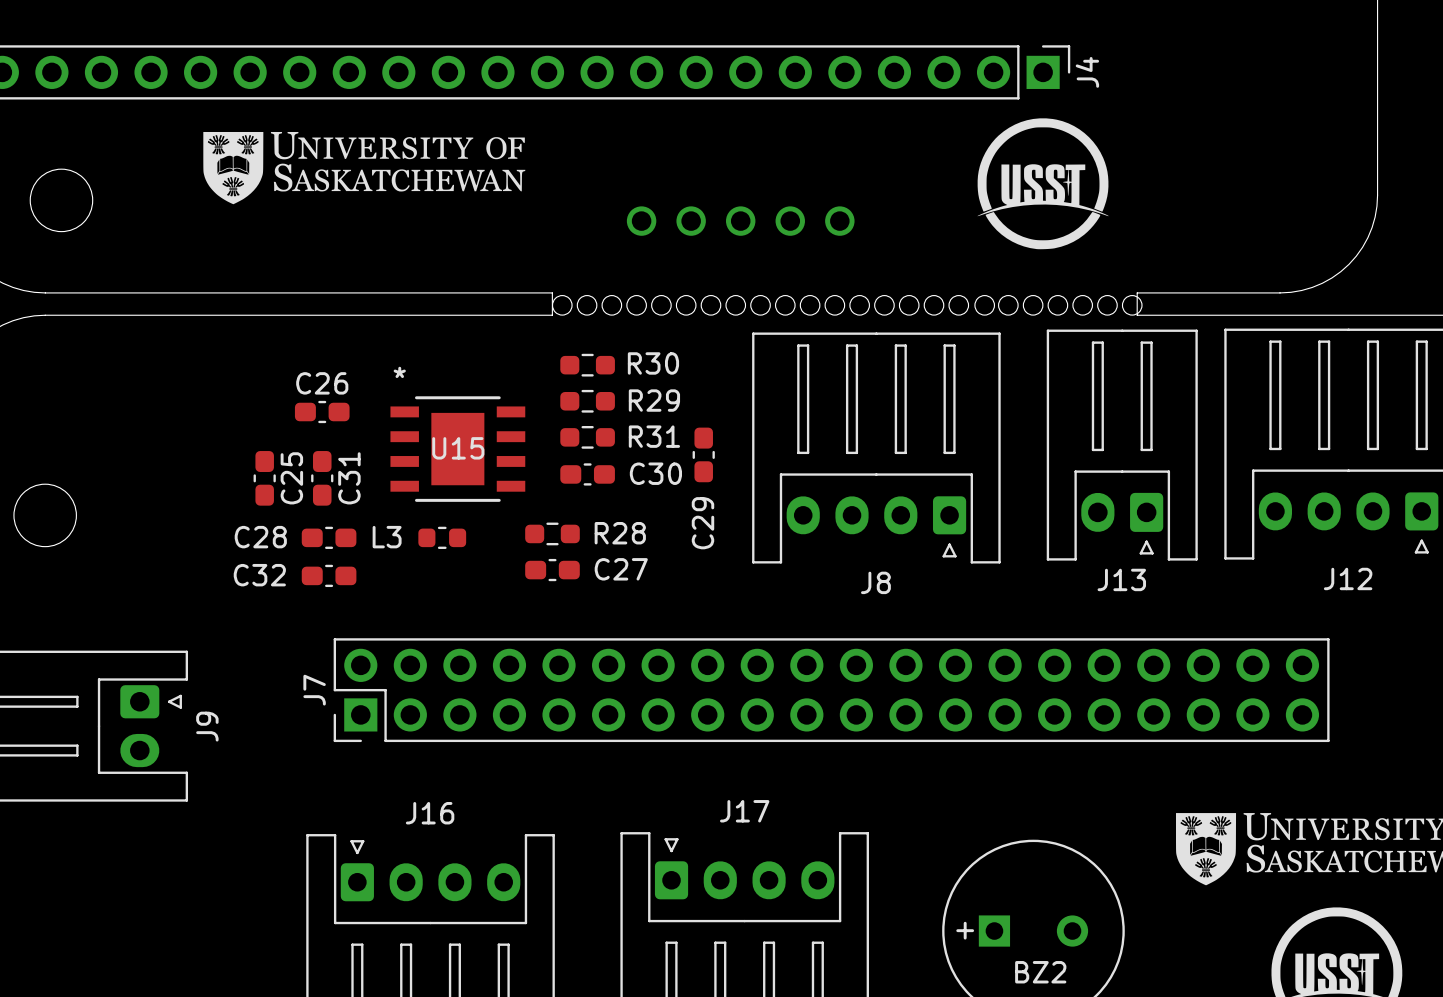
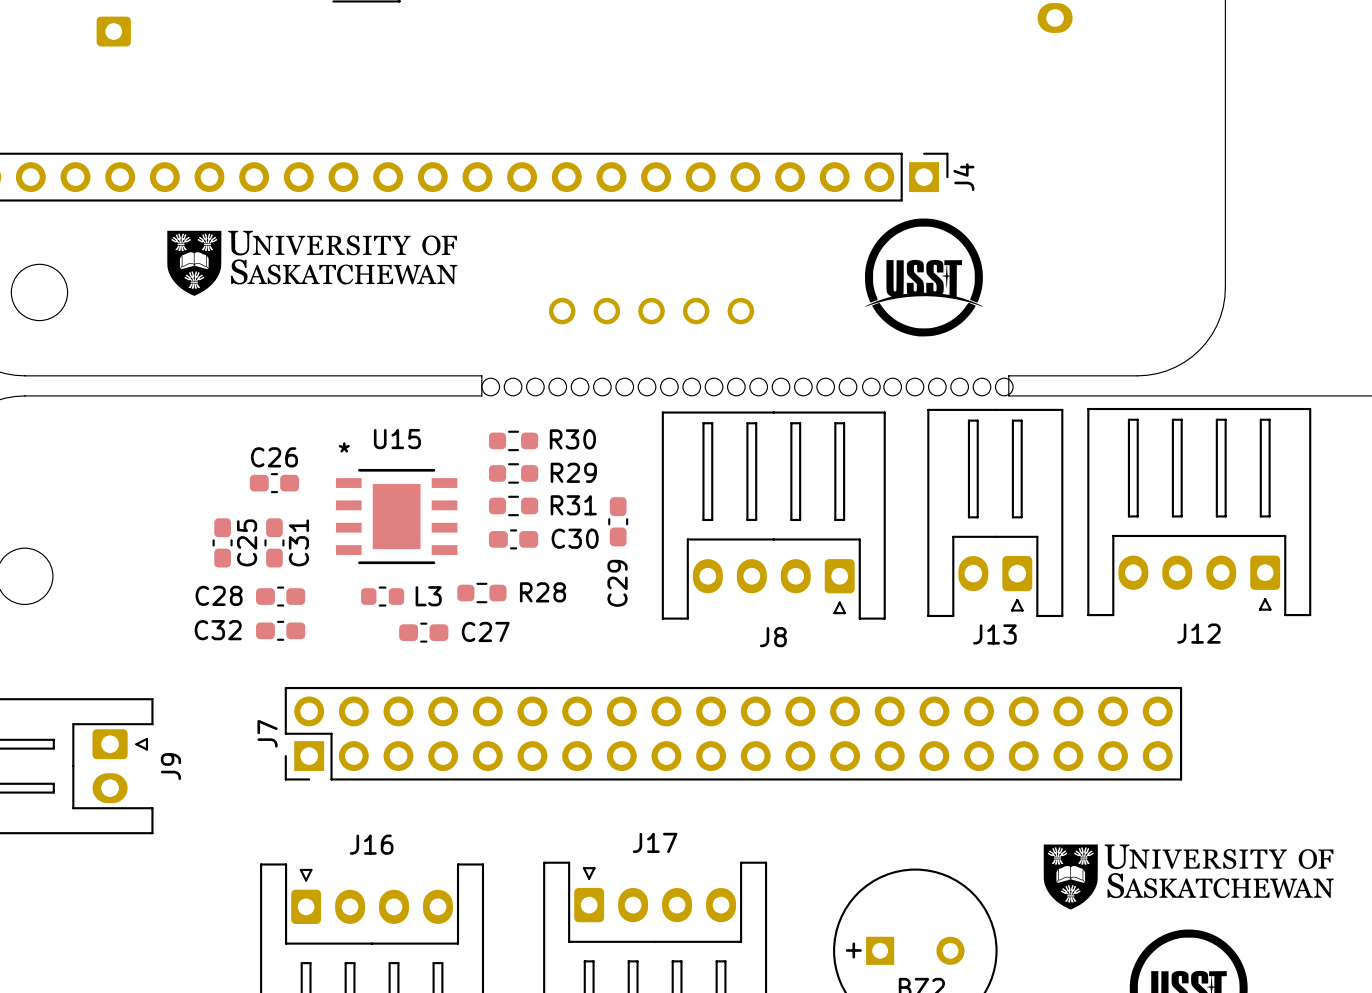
U15 name position: U15 (458, 448) -> U15 (397, 439)
L3 name position: L3 (387, 537) -> L3 (428, 596)
C27 position: (552, 570) -> (423, 632)

